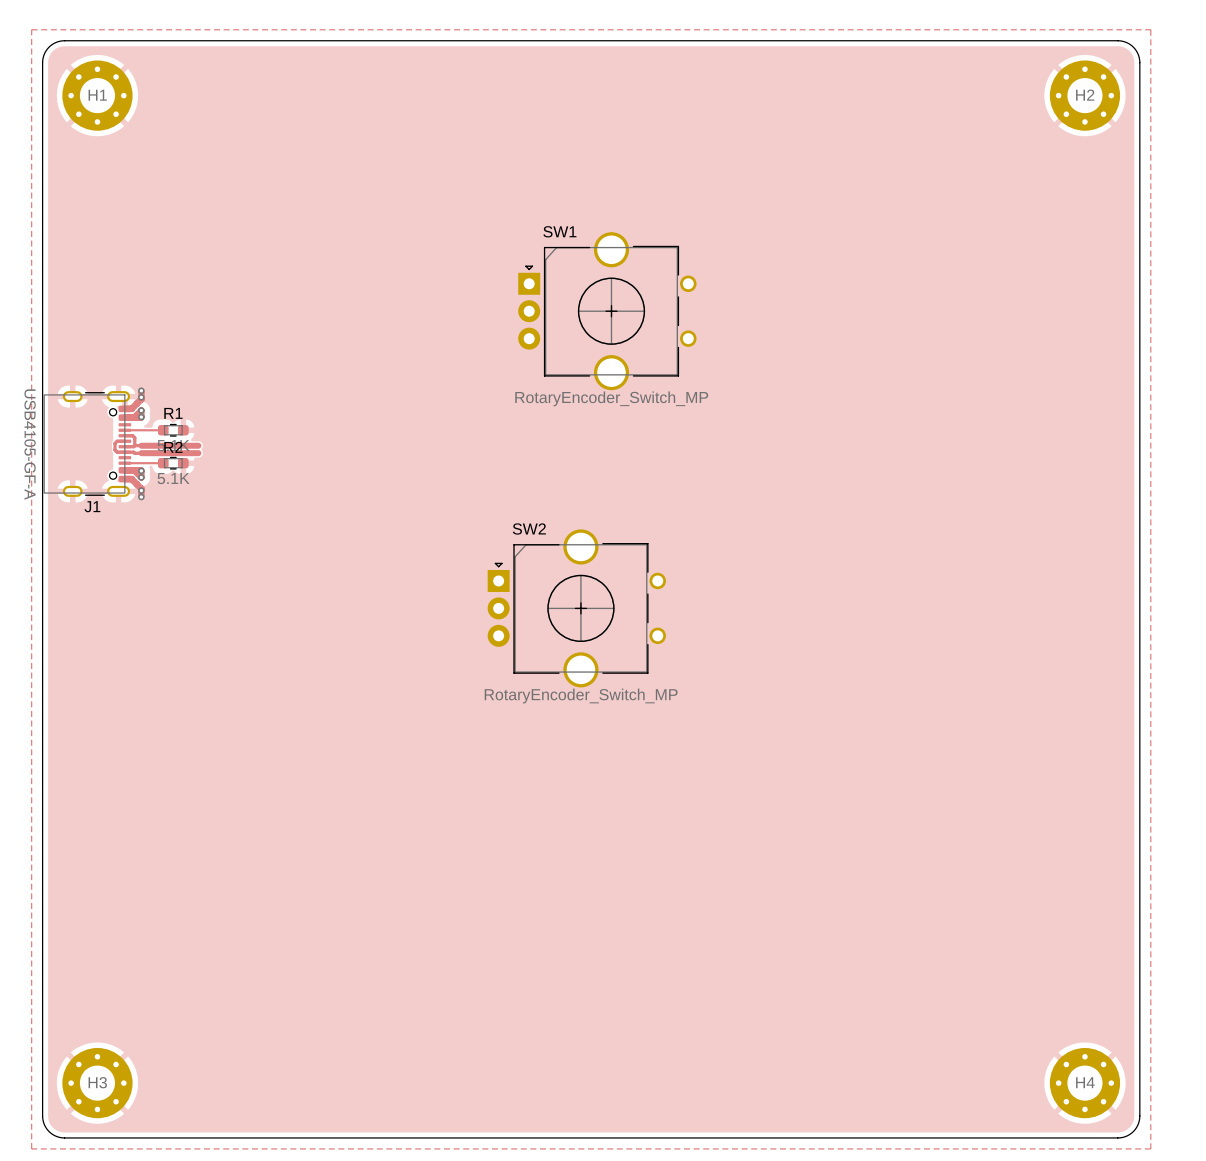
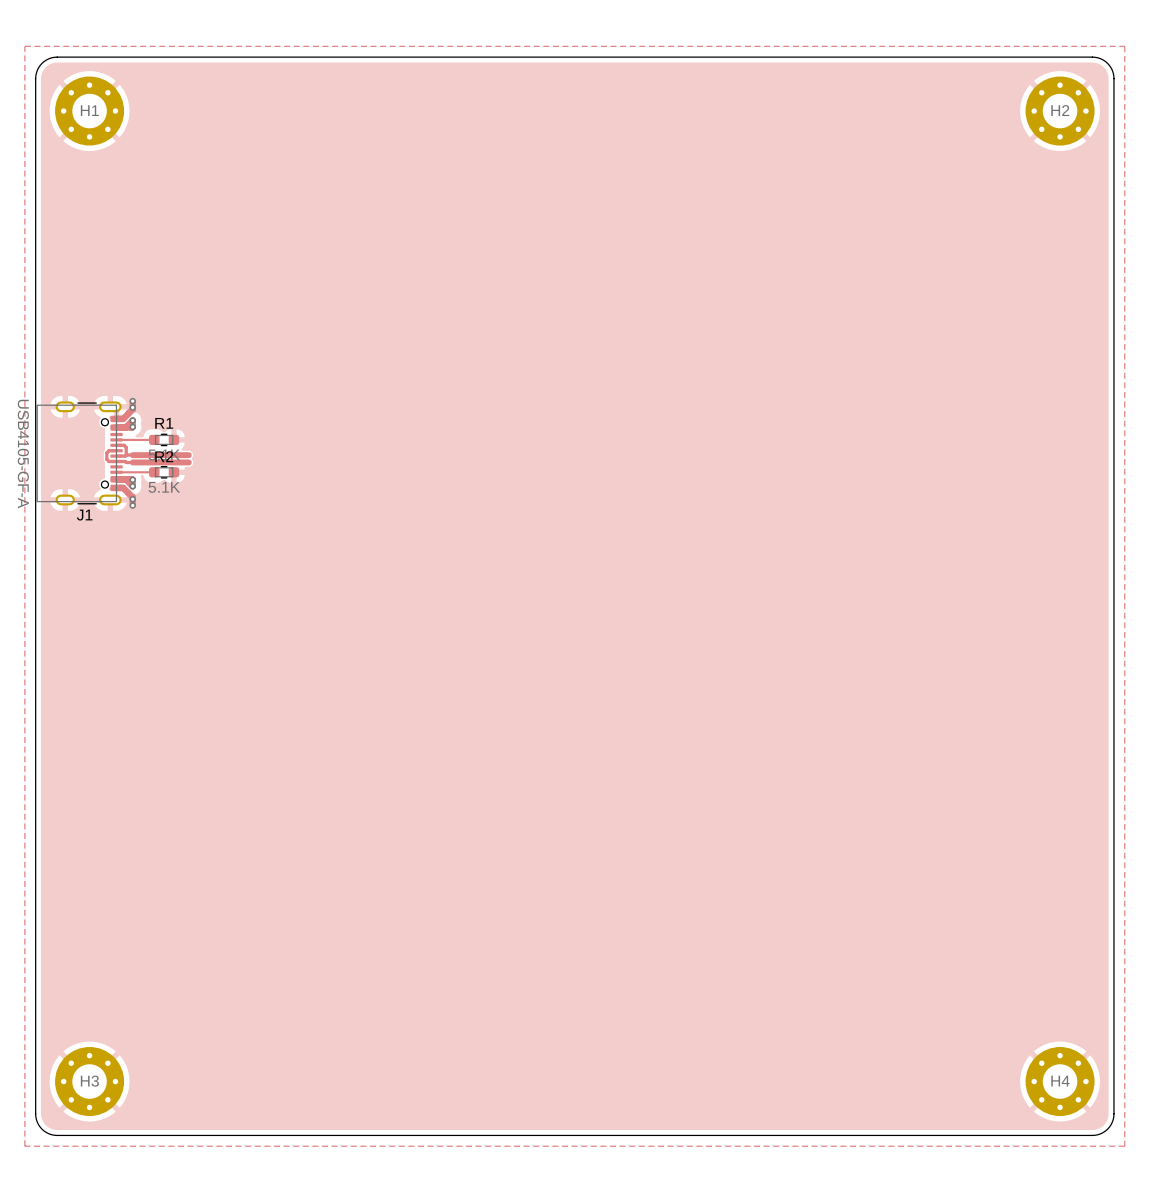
SW1: RotaryEncoder_Switch_MP (607, 311) -> none
SW2: RotaryEncoder_Switch_MP (576, 608) -> none

